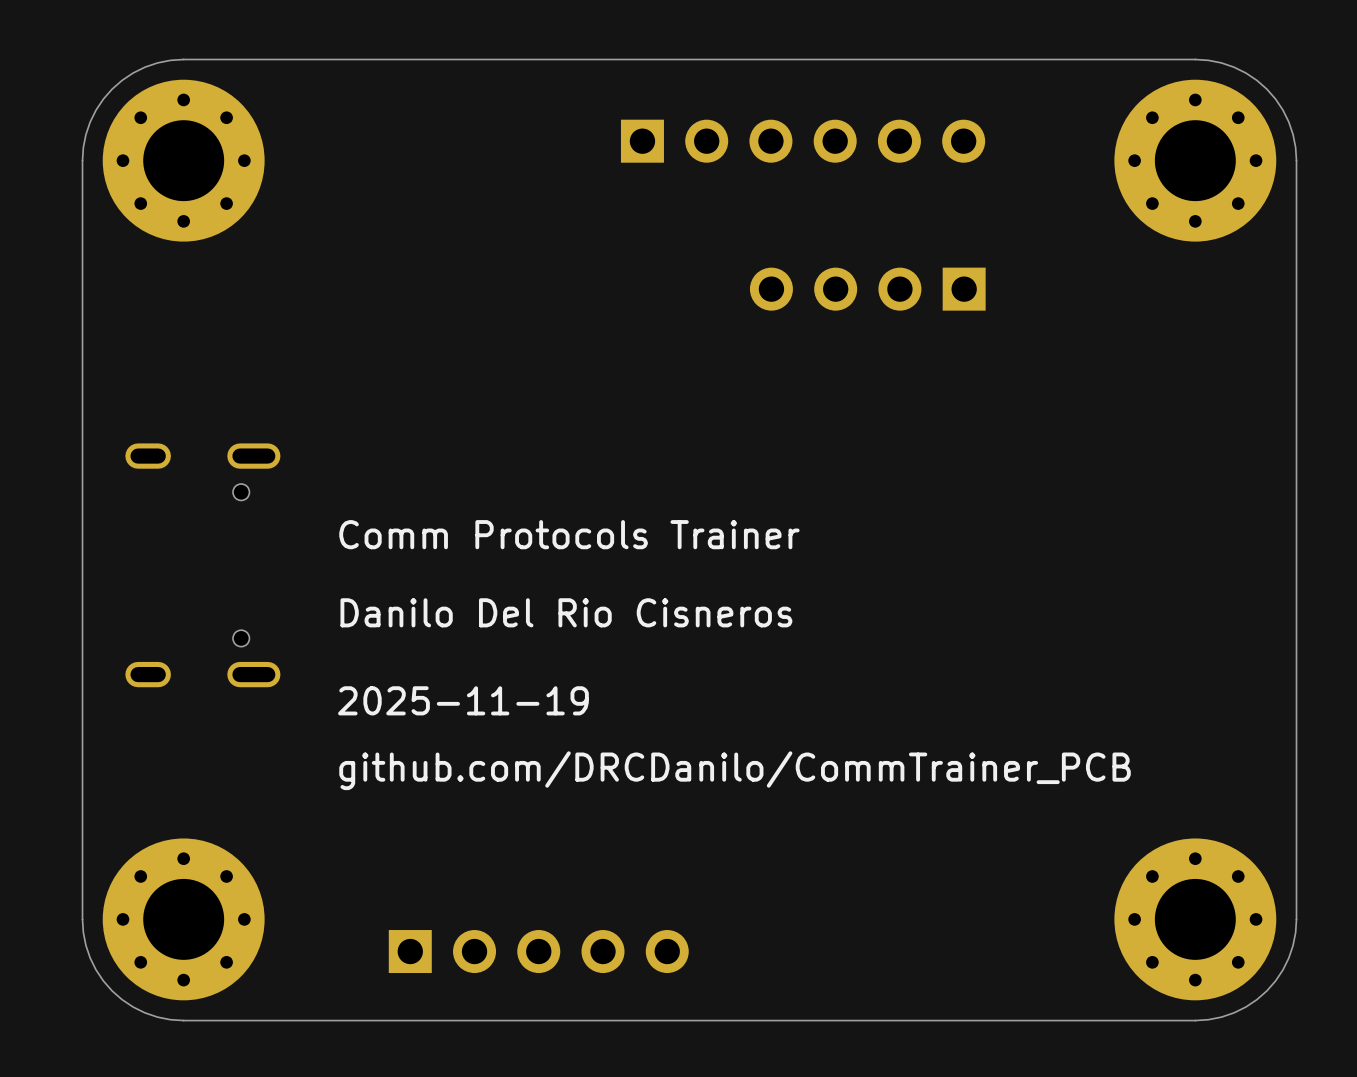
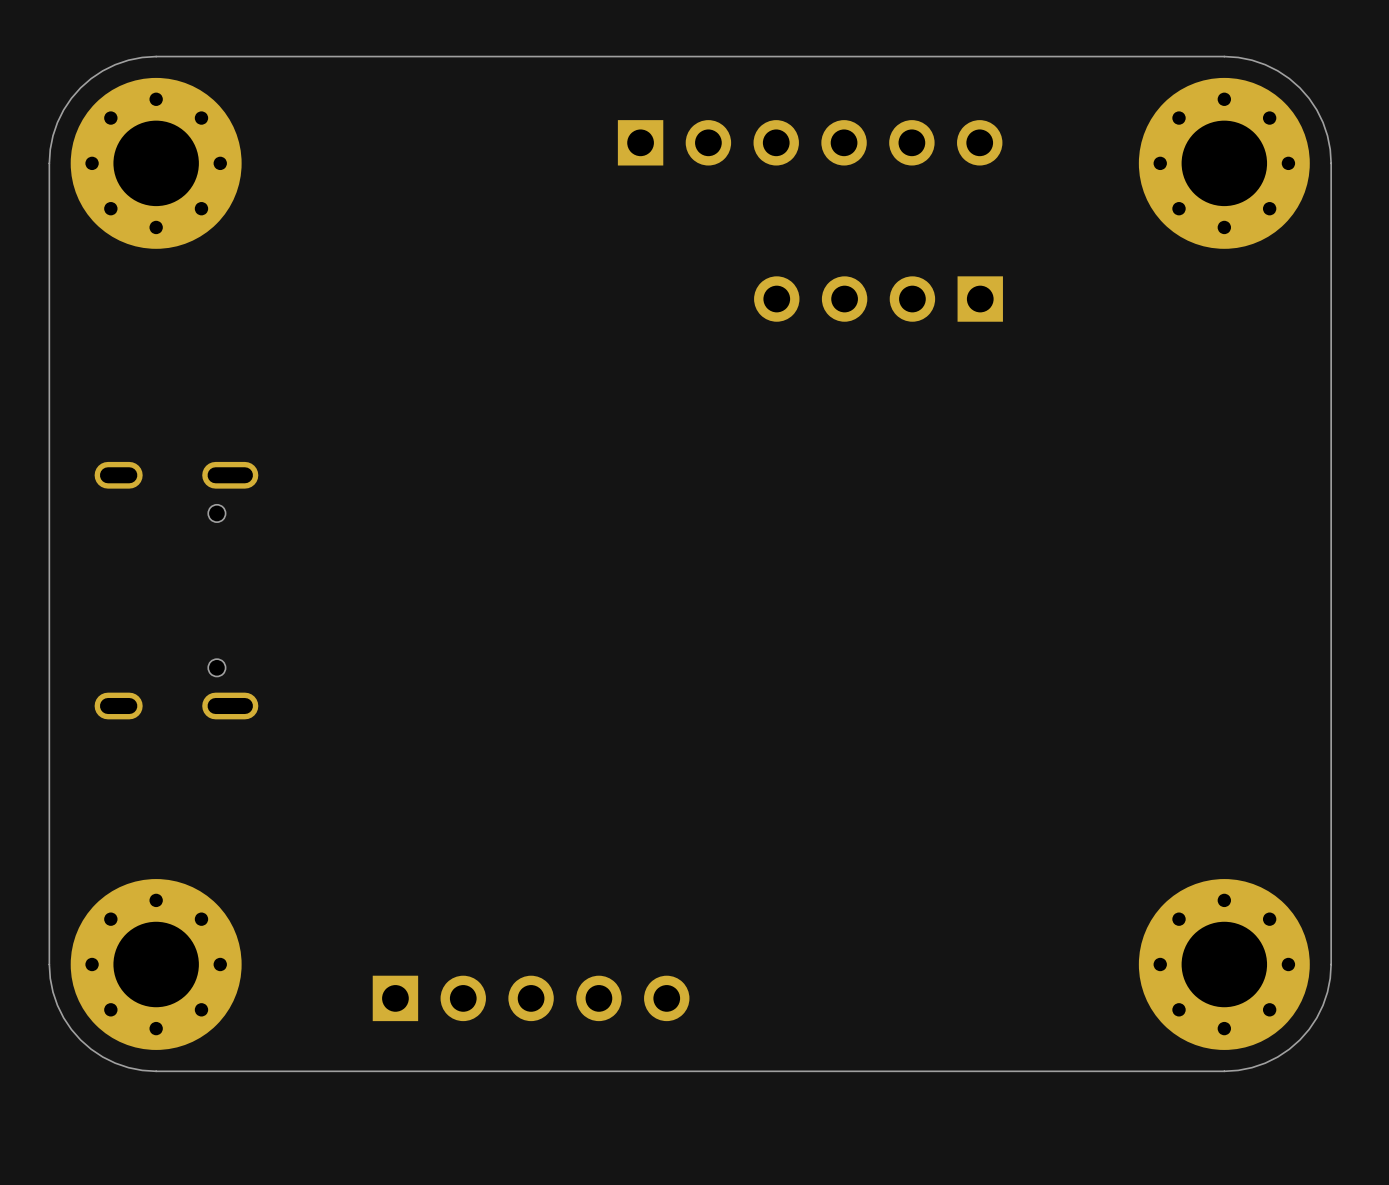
text: Comm Protocols Trainer (569, 534) -> none
text: Danilo Del Rio Cisneros (566, 612) -> none
text: 2025-11-19 (463, 700) -> none
text: github.com/DRCDanilo/CommTrainer_PCB (735, 770) -> none

